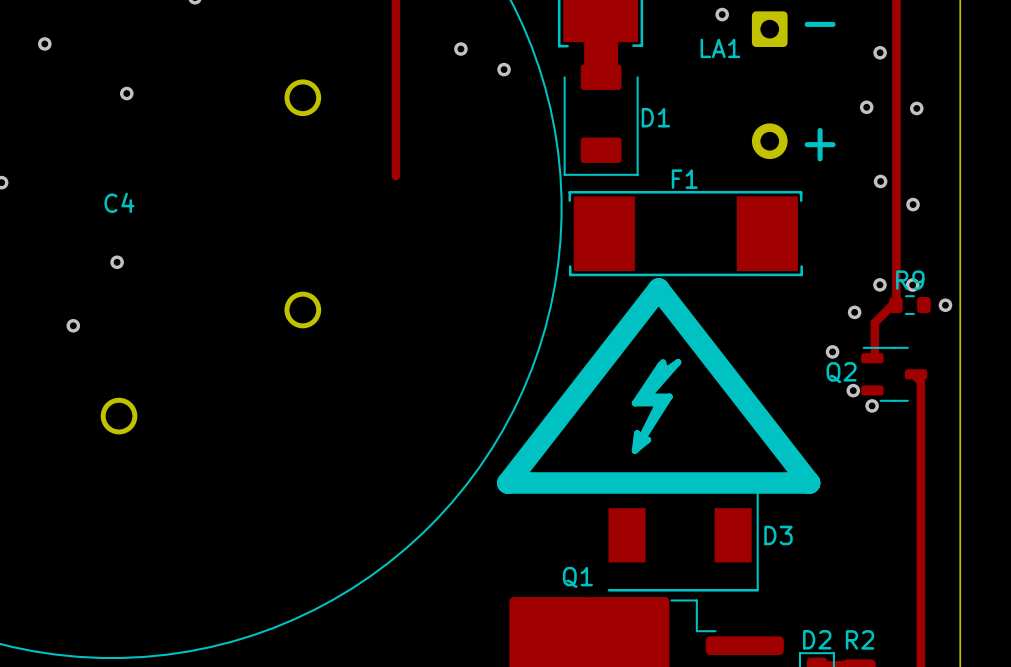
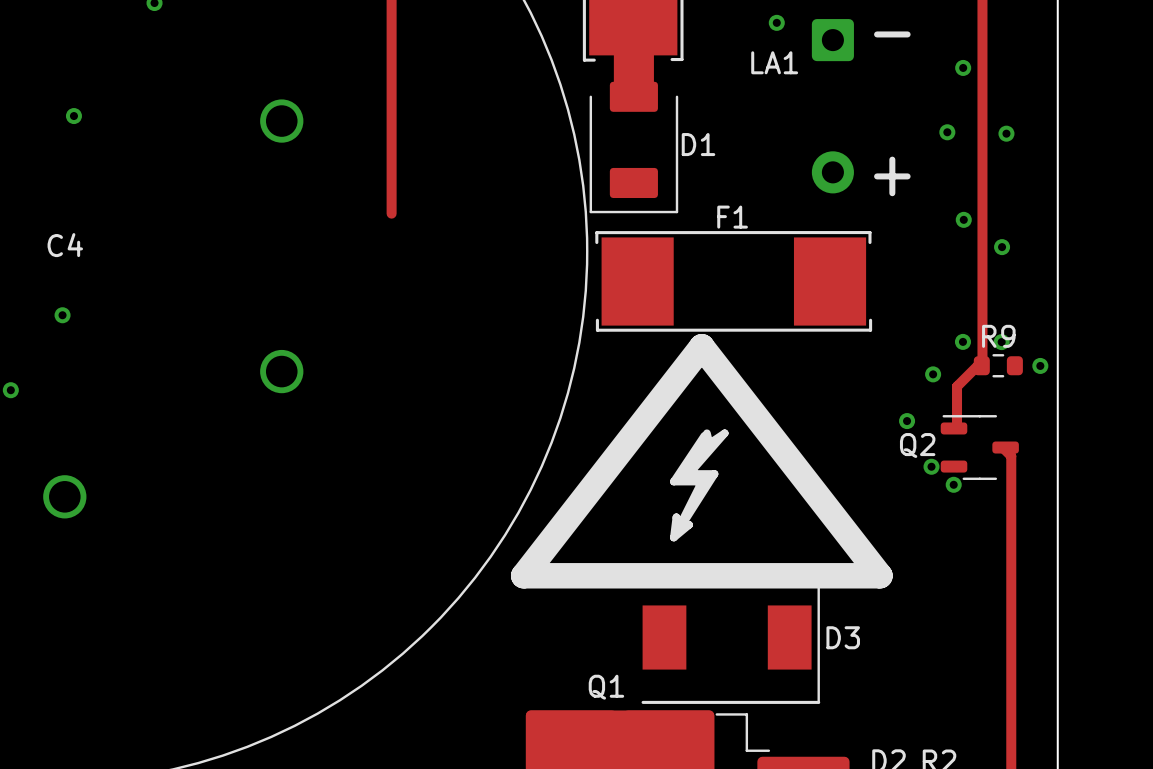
via: (460, 49) -> none
via: (504, 69) -> none

